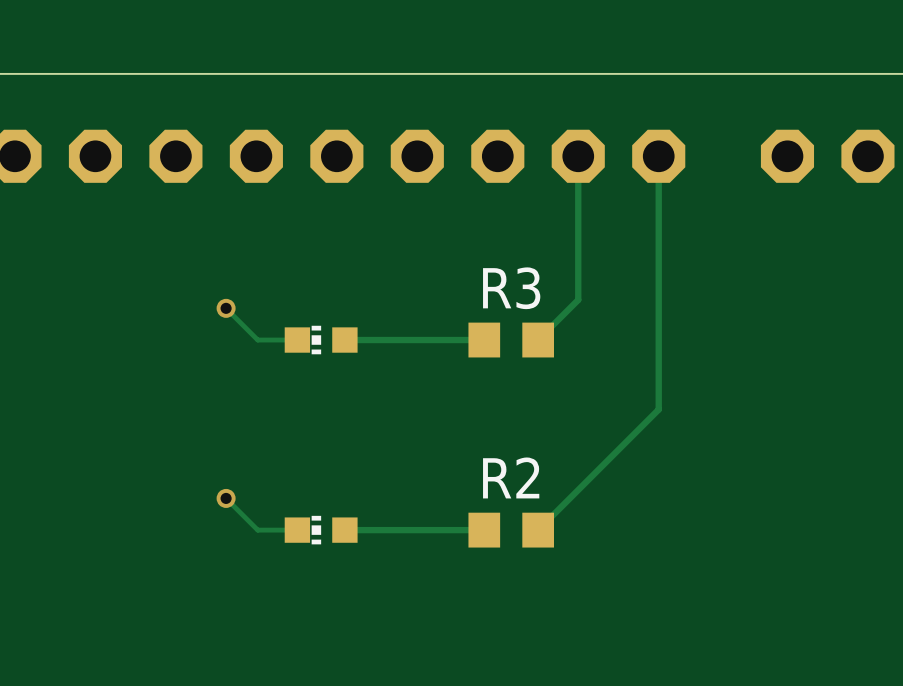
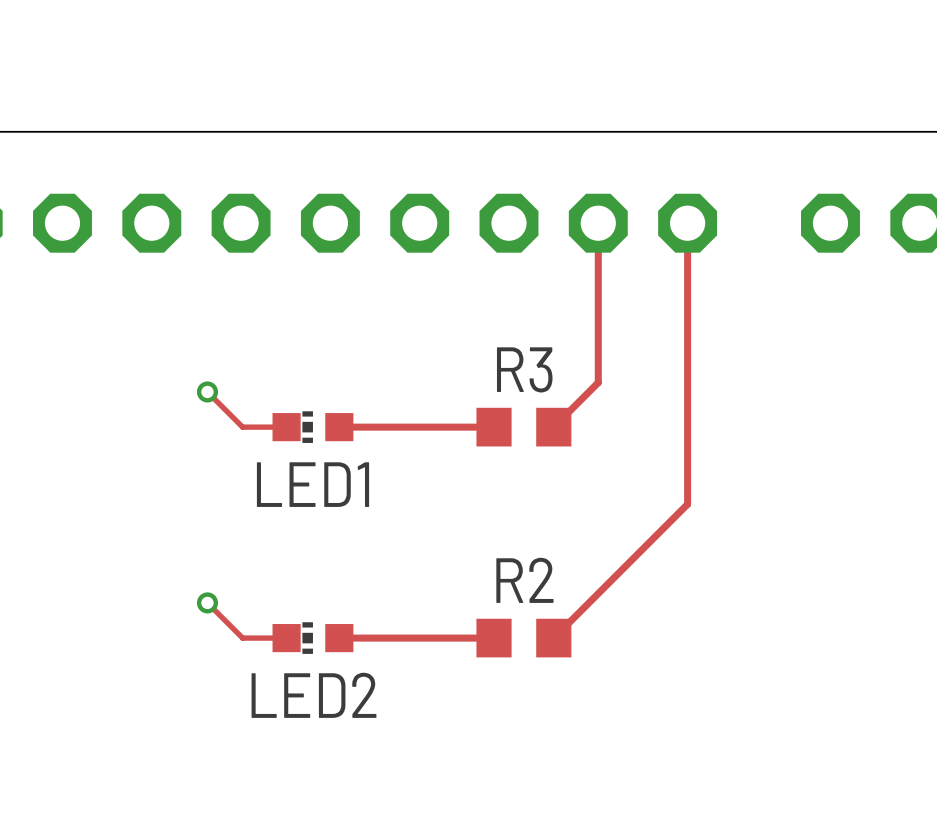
LED1 name: none -> LED1 (312, 484)
LED2 name: none -> LED2 (313, 695)

